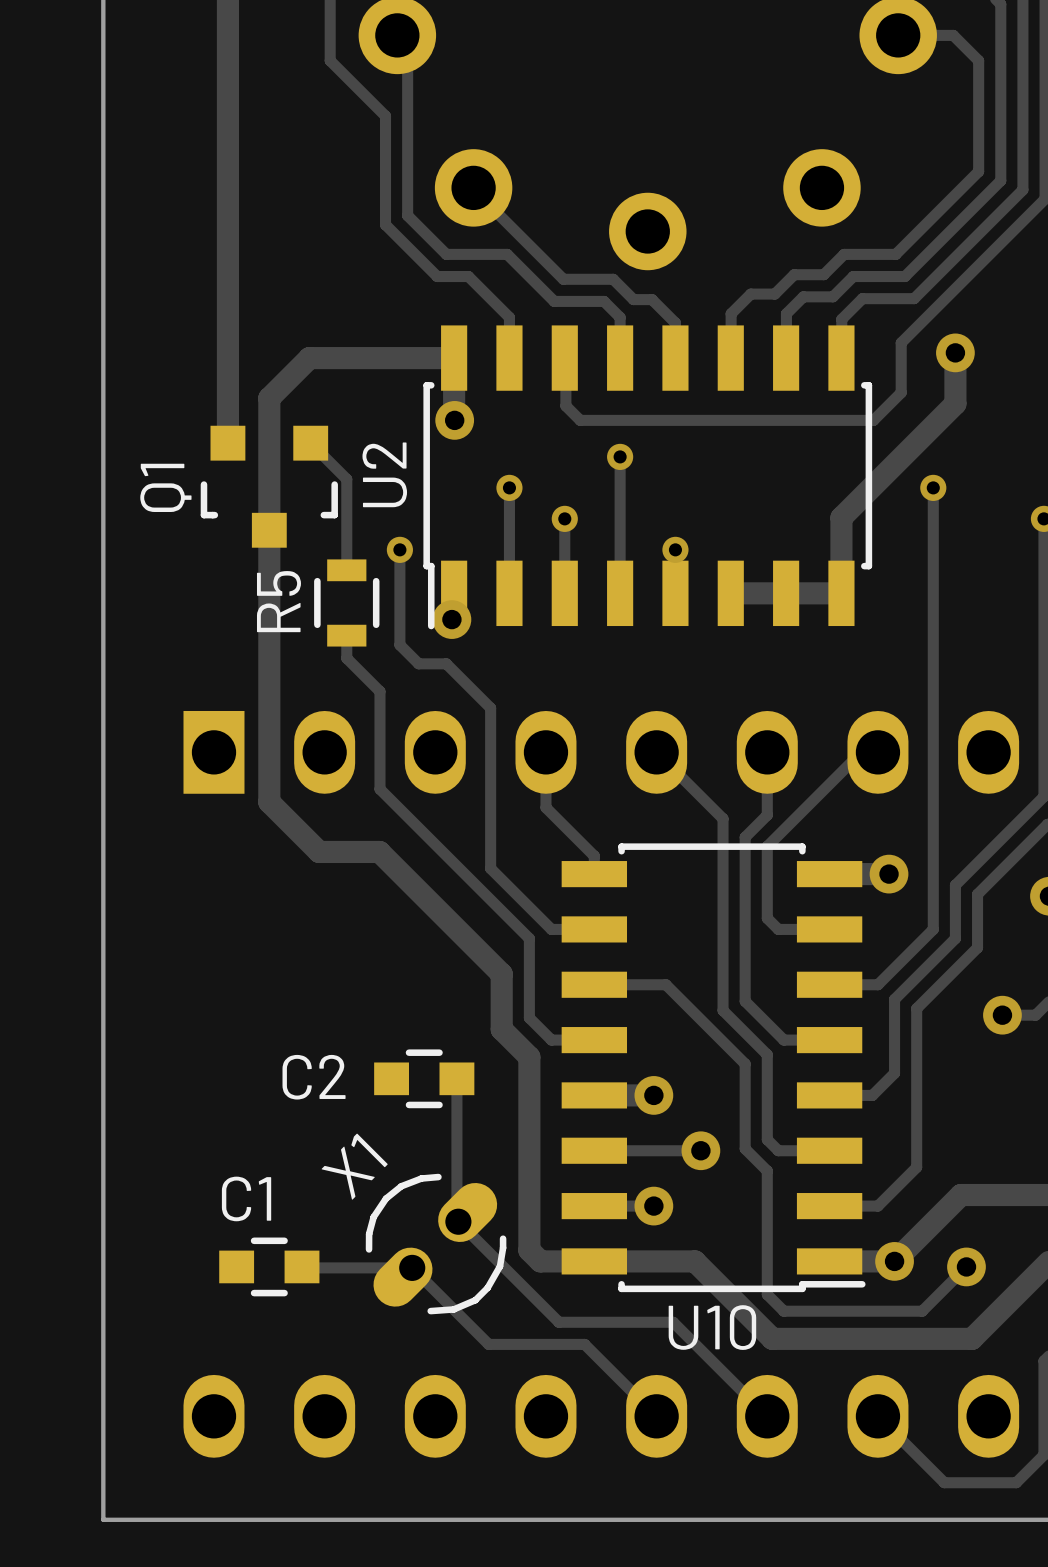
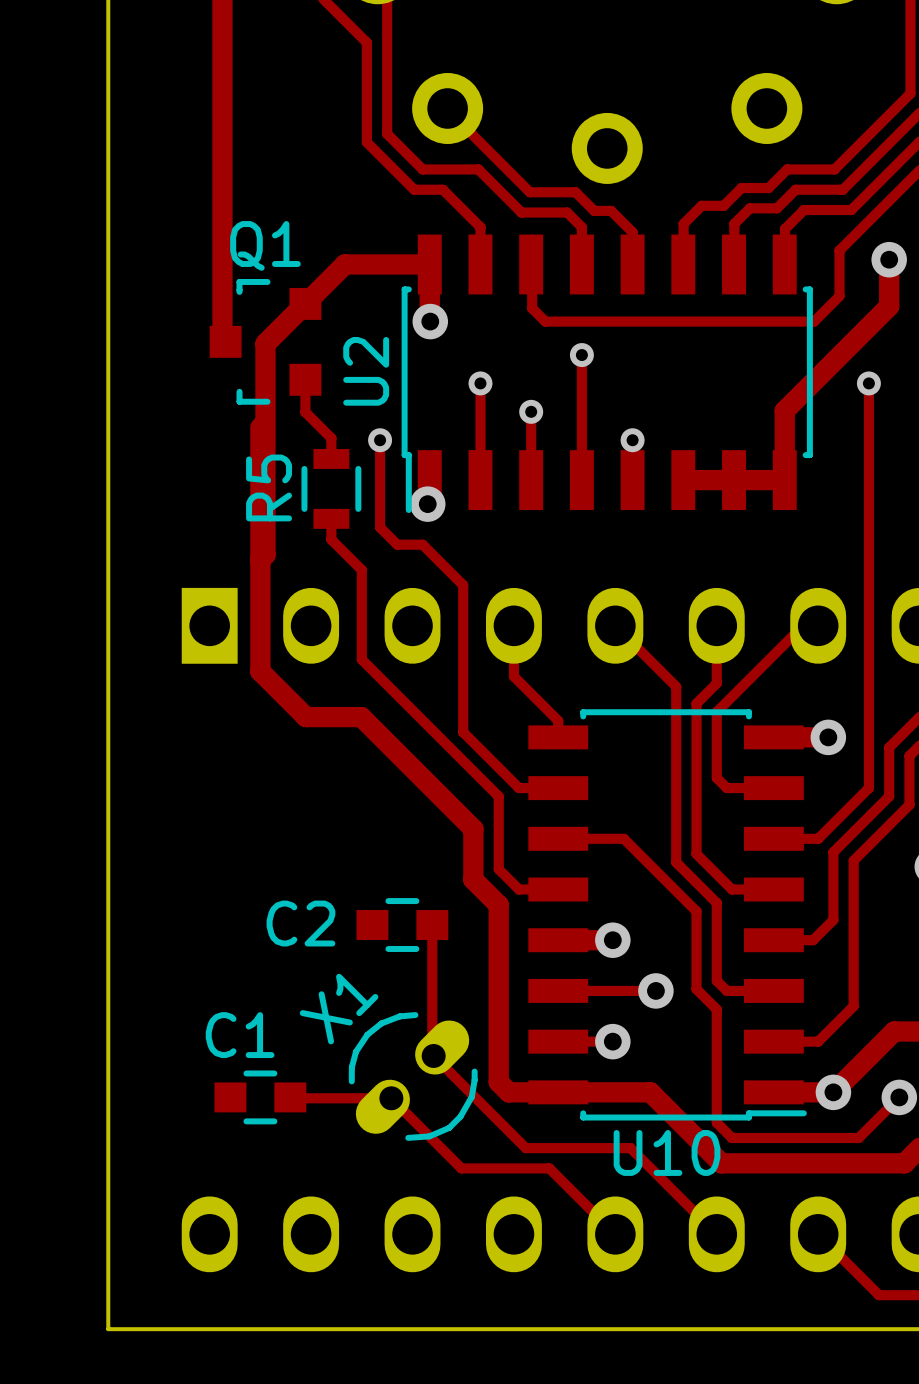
track: (361, 358) (309, 358) (269, 398) (269, 530) -> (344, 264) (265, 343) (265, 554) (260, 559)
track: (310, 443) (346, 479) (346, 547) -> (305, 379) (305, 412) (331, 438)
Q1 rotation: 0° (269, 486) -> 90° clockwise (265, 341)

